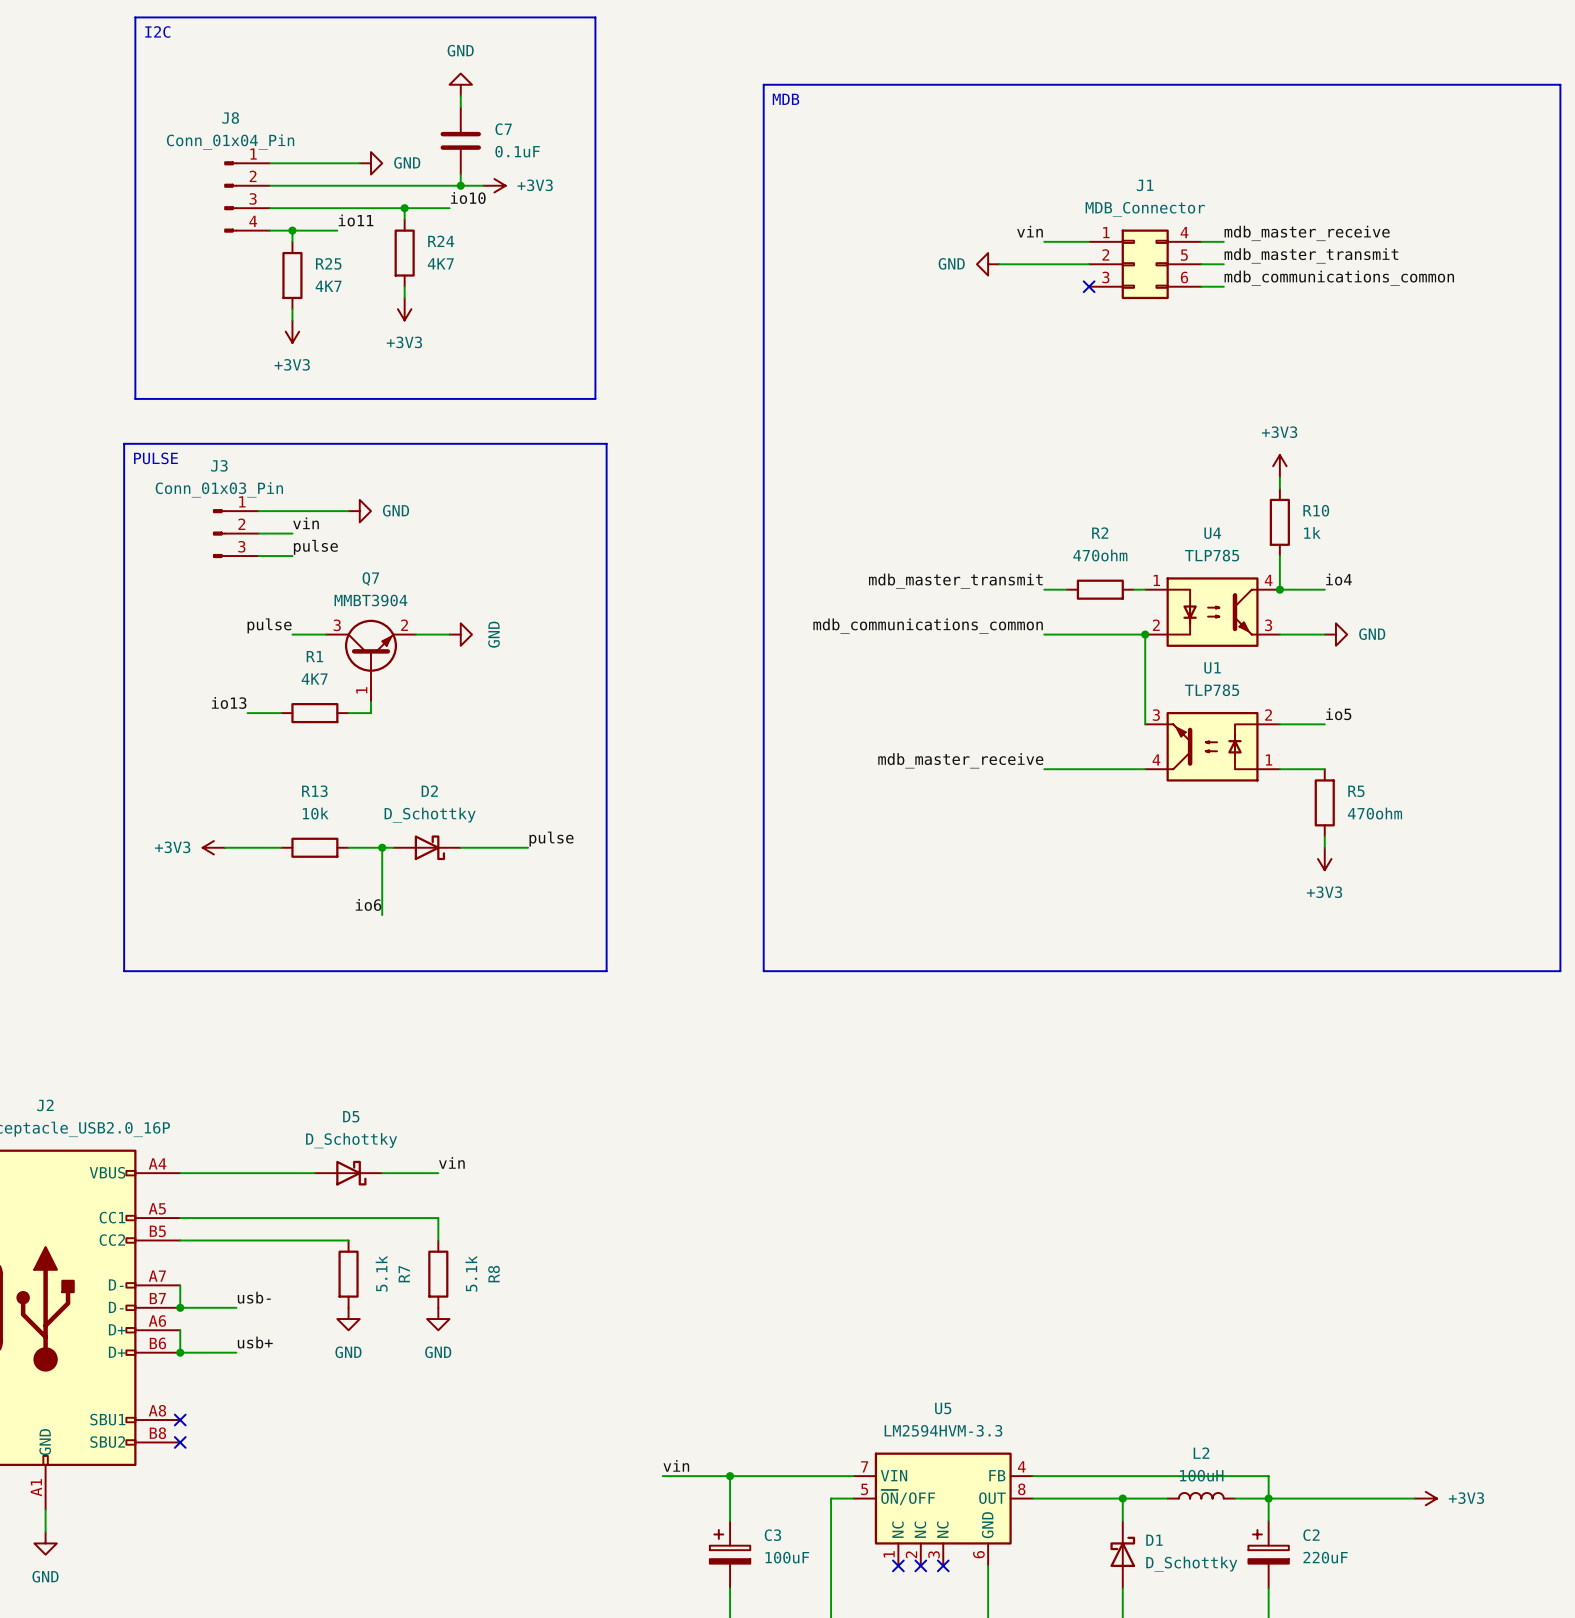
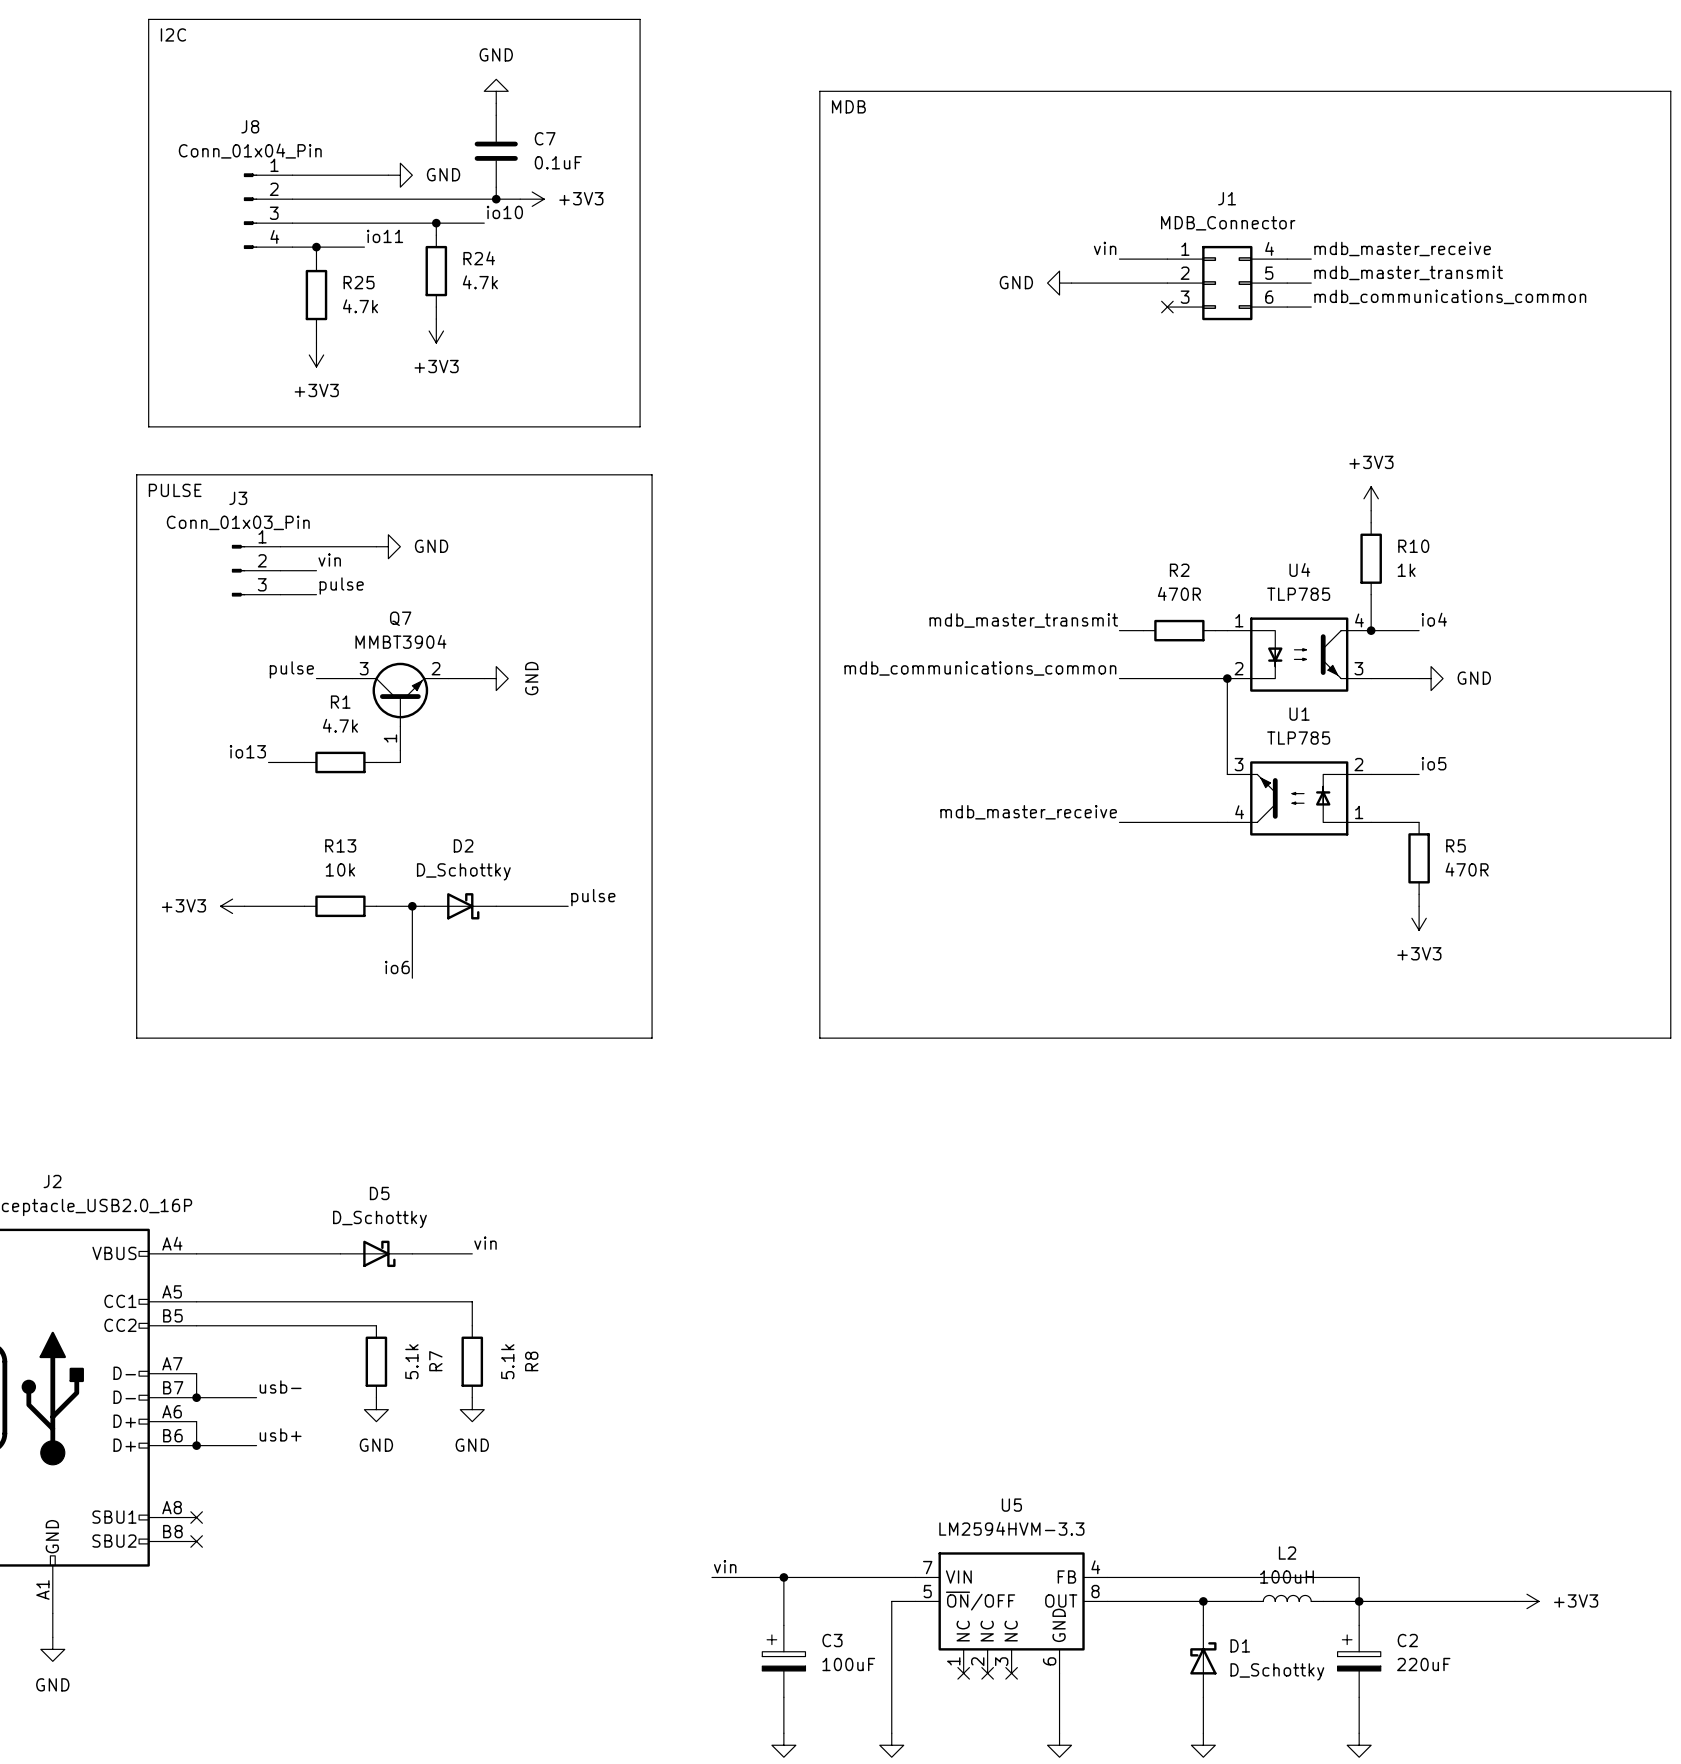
R24 value: 4K7 (440, 263) -> 4.7k (480, 282)
R25 value: 4K7 (328, 286) -> 4.7k (360, 306)
R2 value: 470ohm (1100, 555) -> 470R (1179, 593)
R1 value: 4K7 (314, 679) -> 4.7k (340, 725)
R5 value: 470ohm (1375, 813) -> 470R (1467, 869)

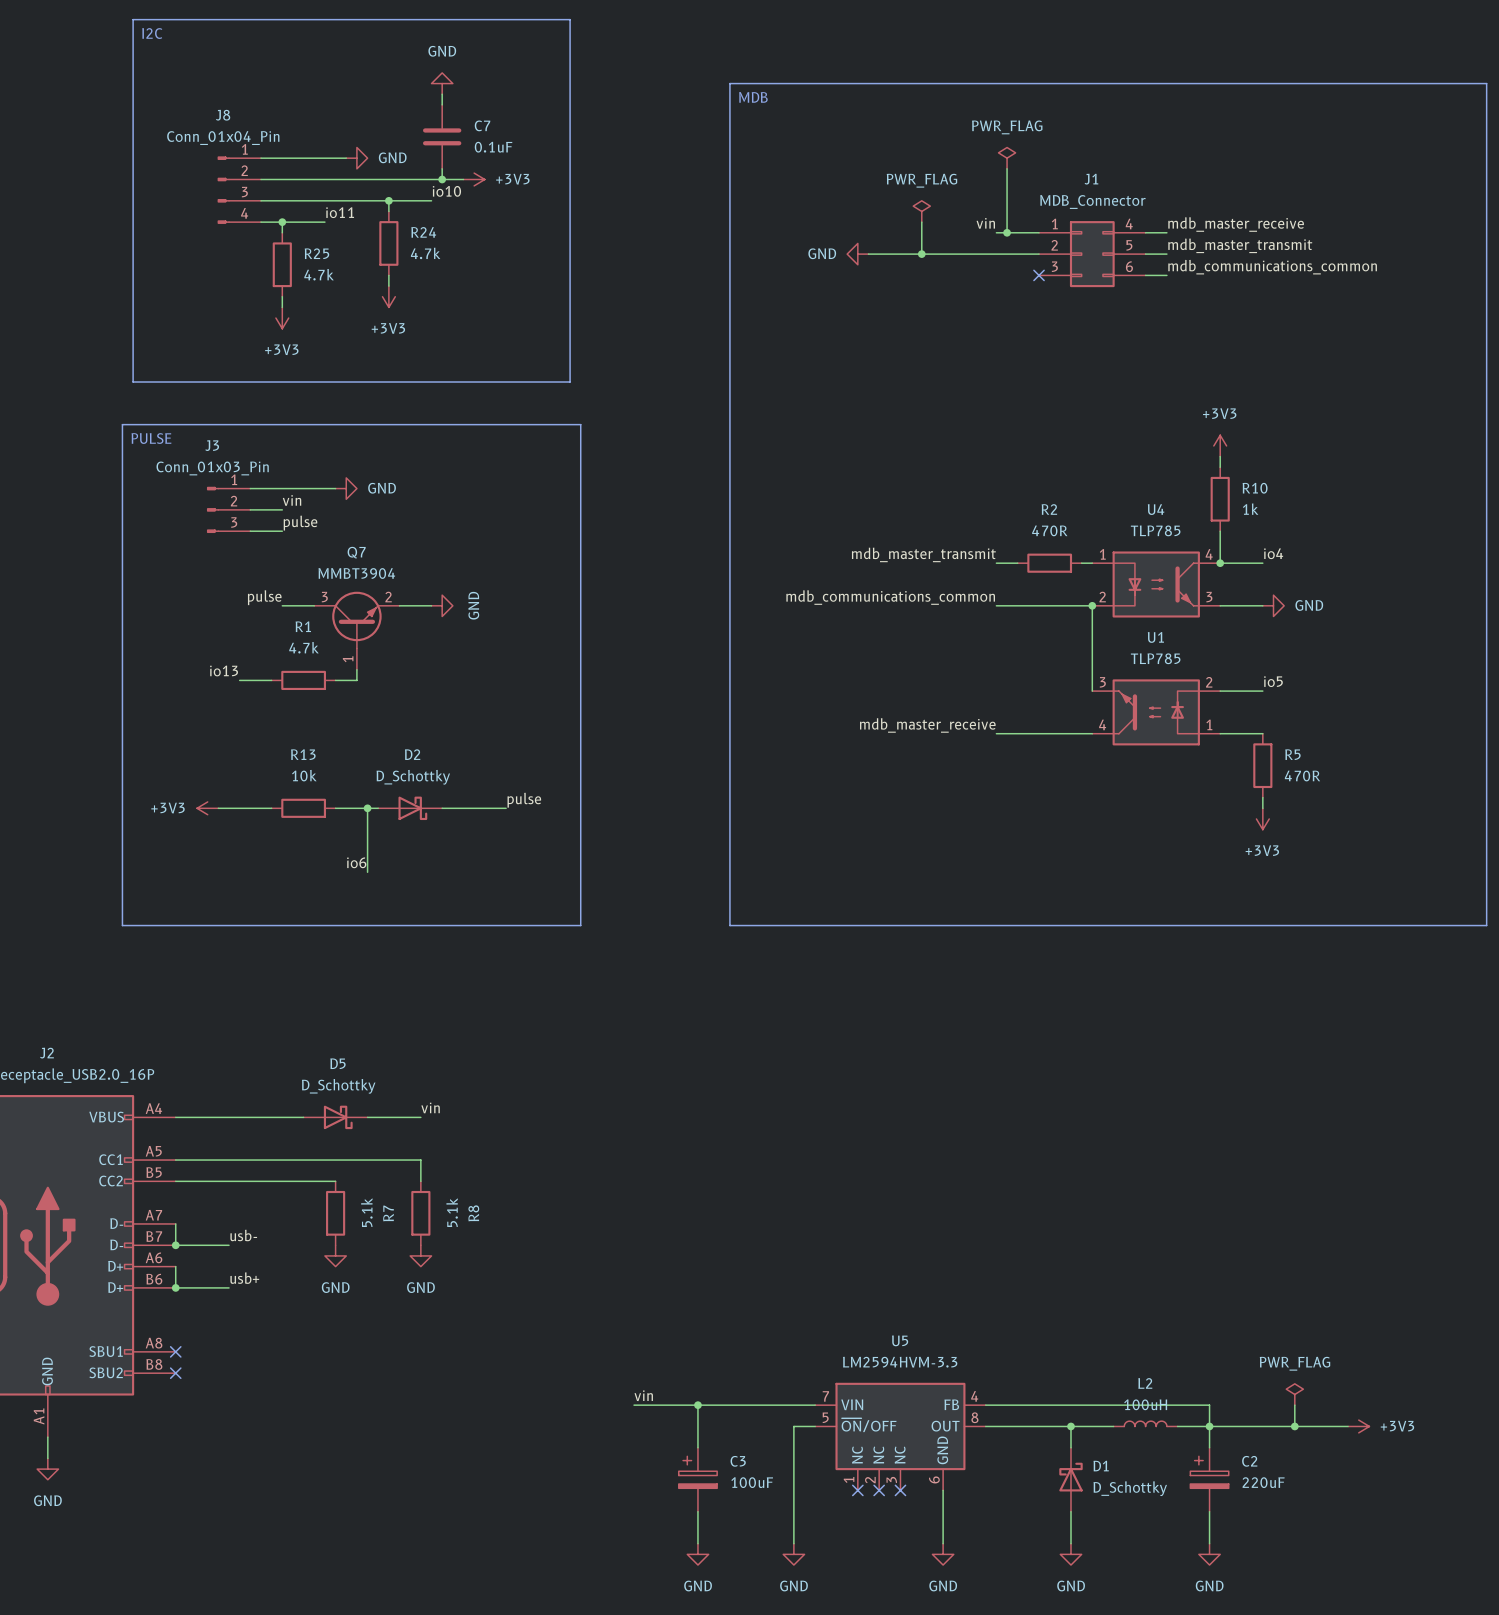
power symbol: none -> PWR_FLAG (1007, 158)
wire: none -> (1007, 168) (1007, 232)
power symbol: none -> PWR_FLAG (921, 211)
wire: none -> (921, 222) (921, 254)
junction: none -> (1007, 232)
wire: none -> (868, 254) (953, 254)
junction: none -> (921, 254)
power symbol position: GND (1059, 283) -> GND (857, 254)
power symbol: none -> PWR_FLAG (1294, 1394)
wire: none -> (1294, 1405) (1294, 1426)
junction: none -> (1294, 1426)

